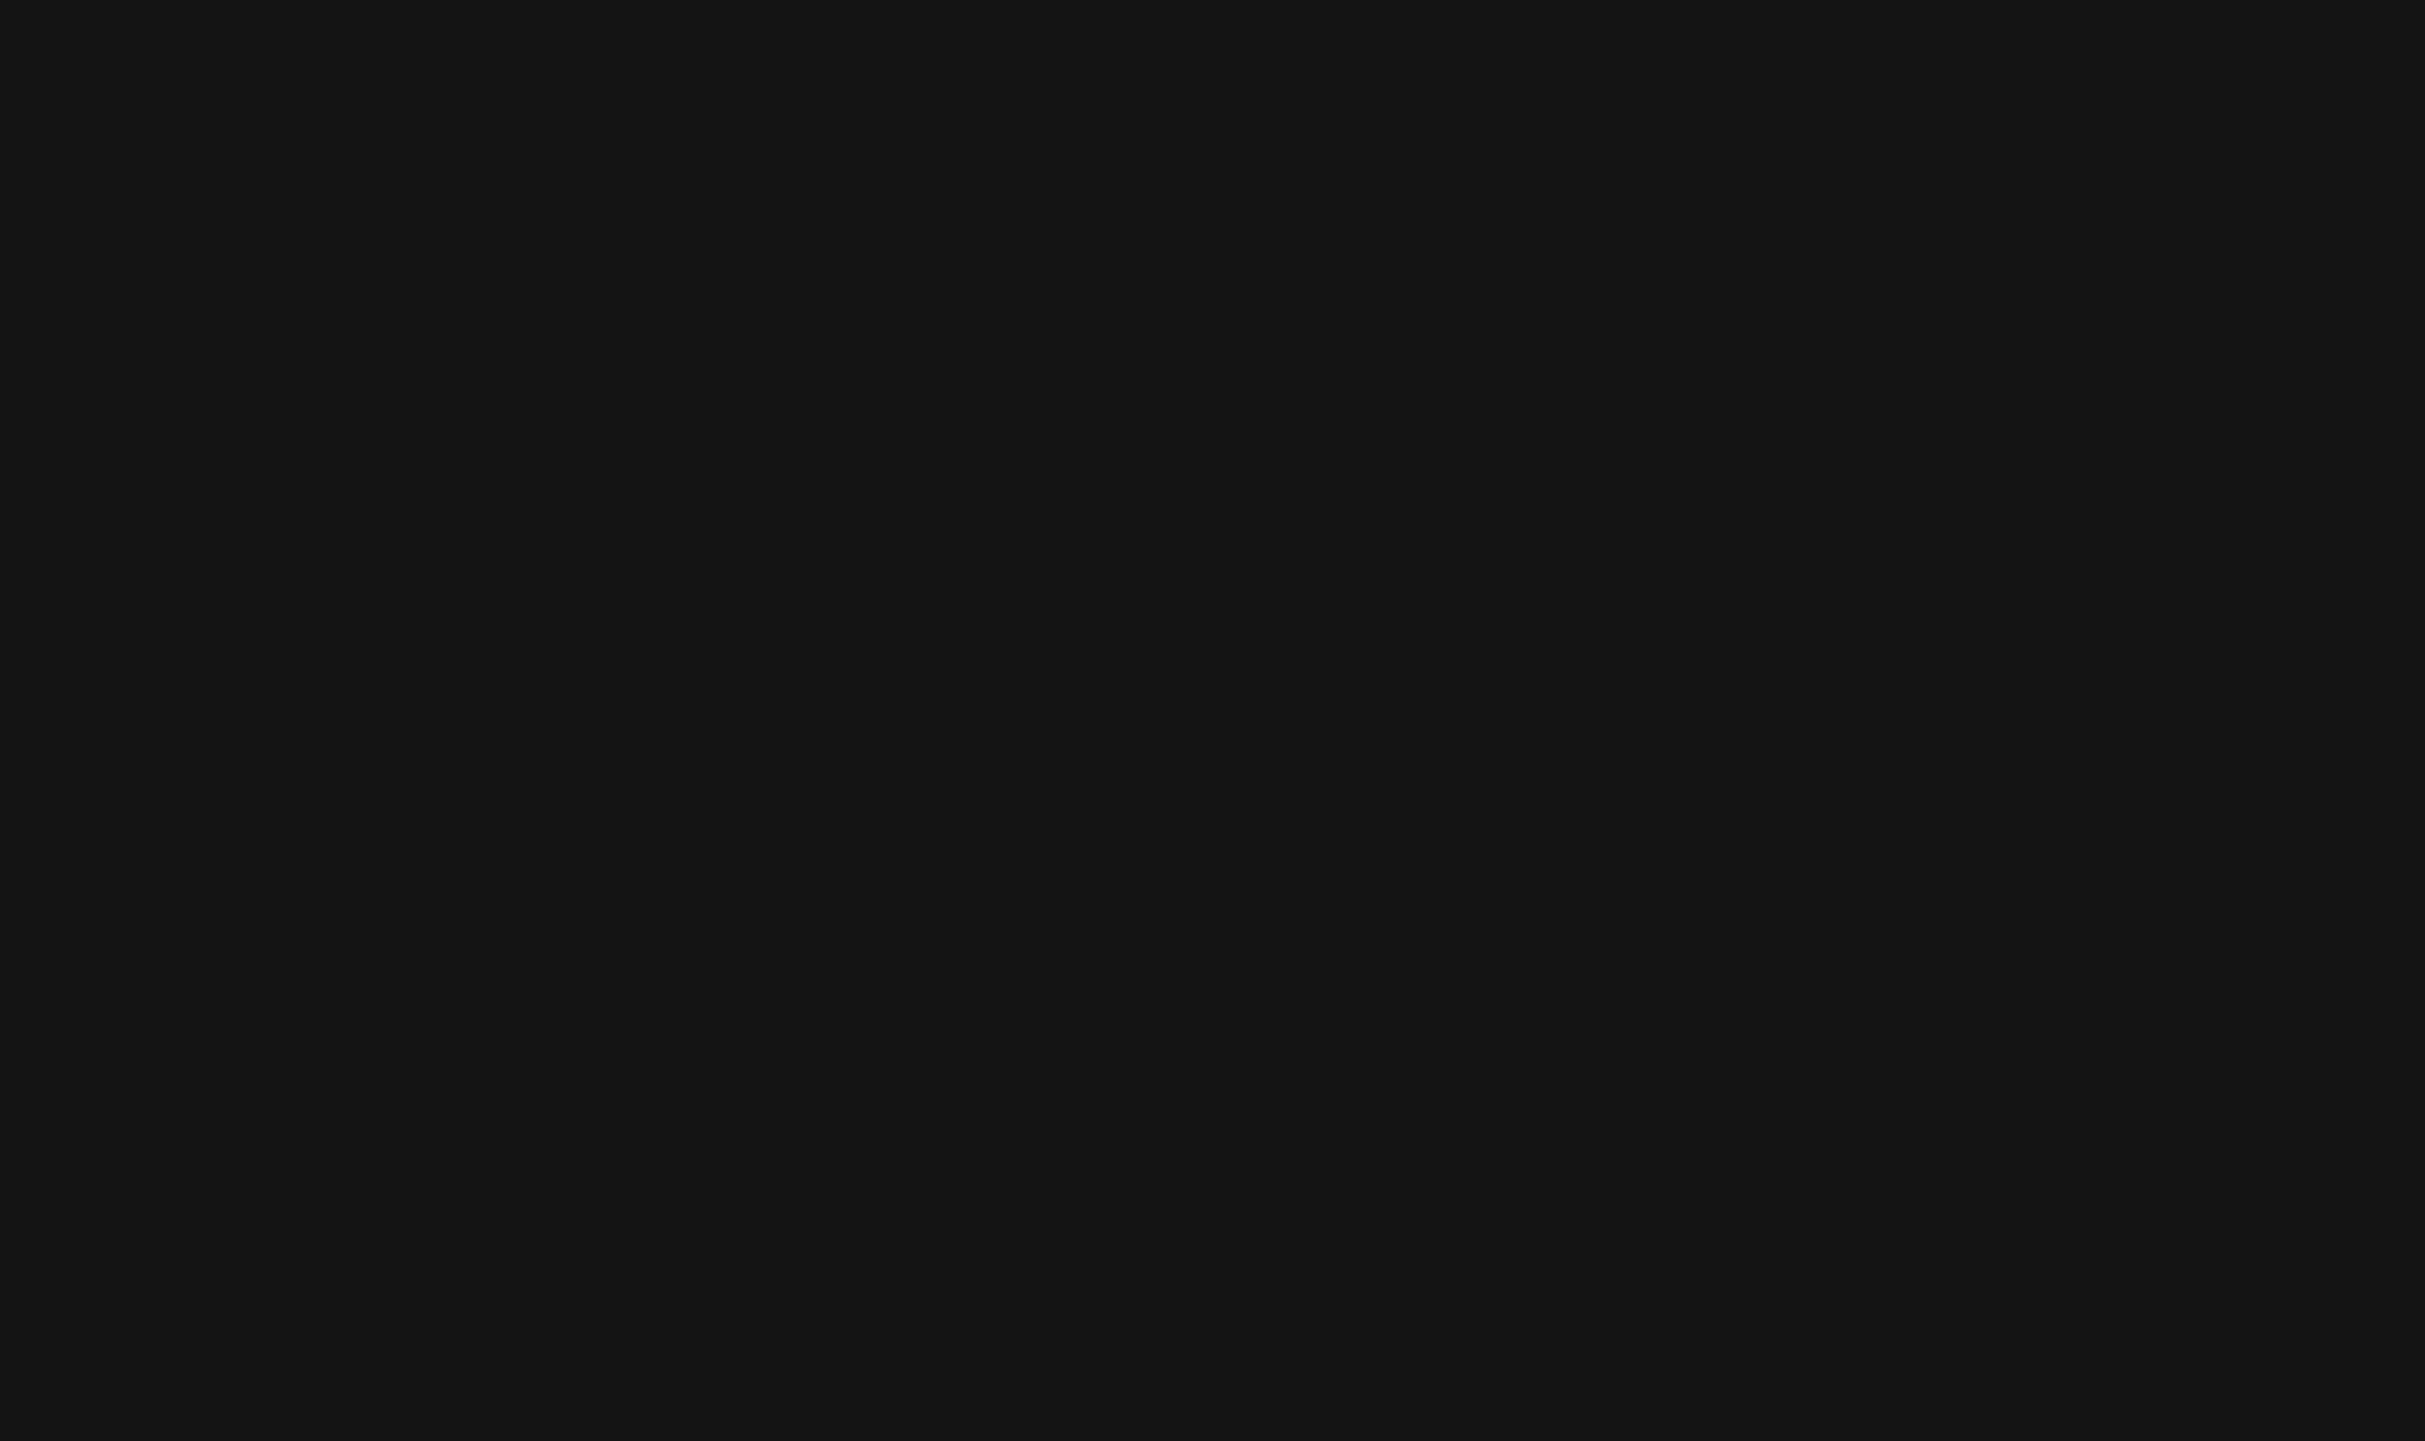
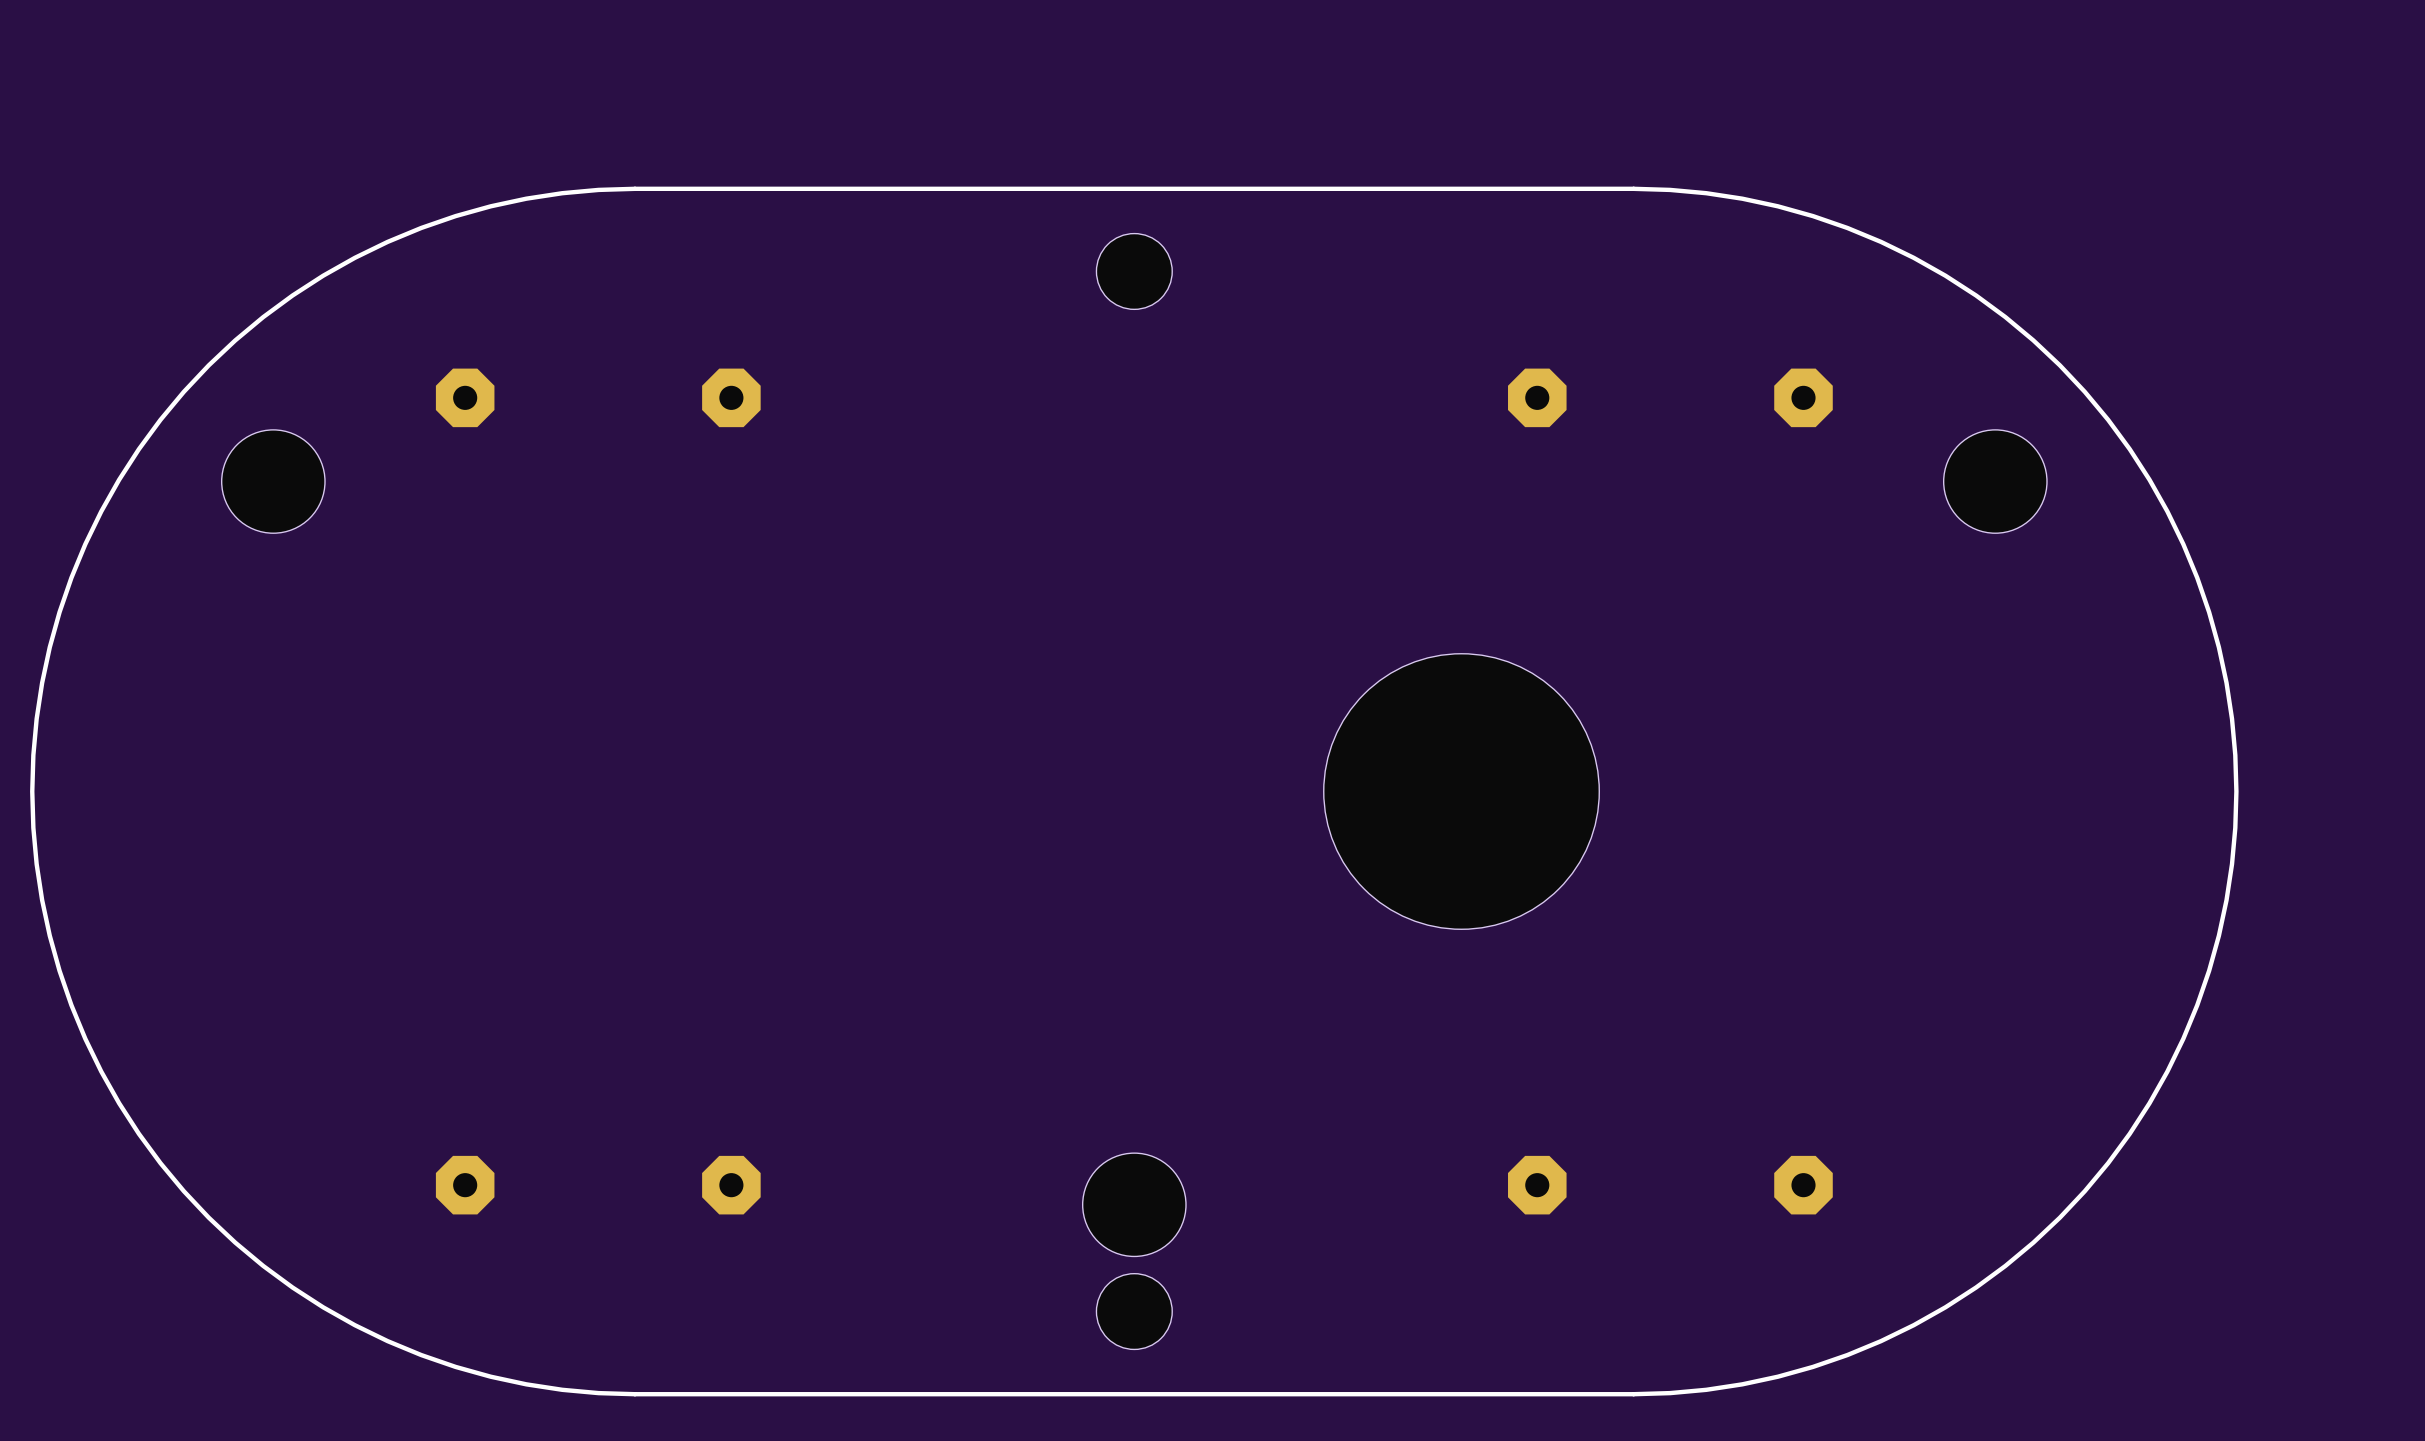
part: none -> (1134, 791)

